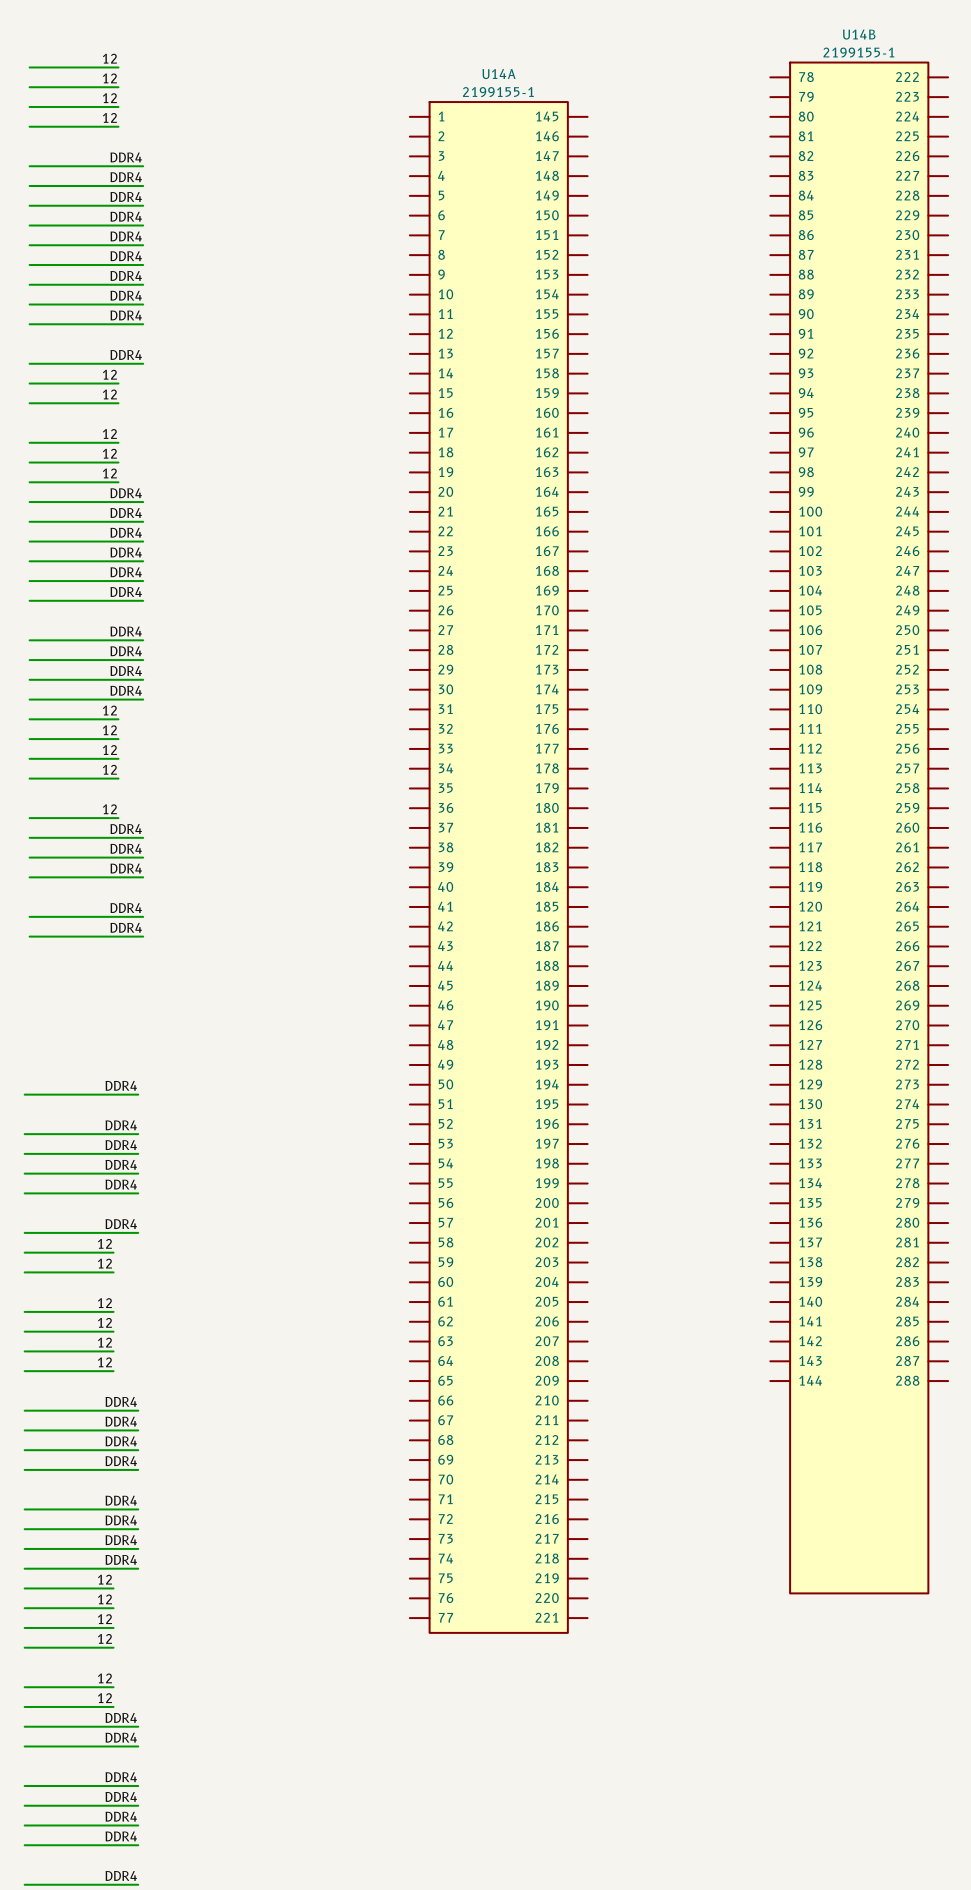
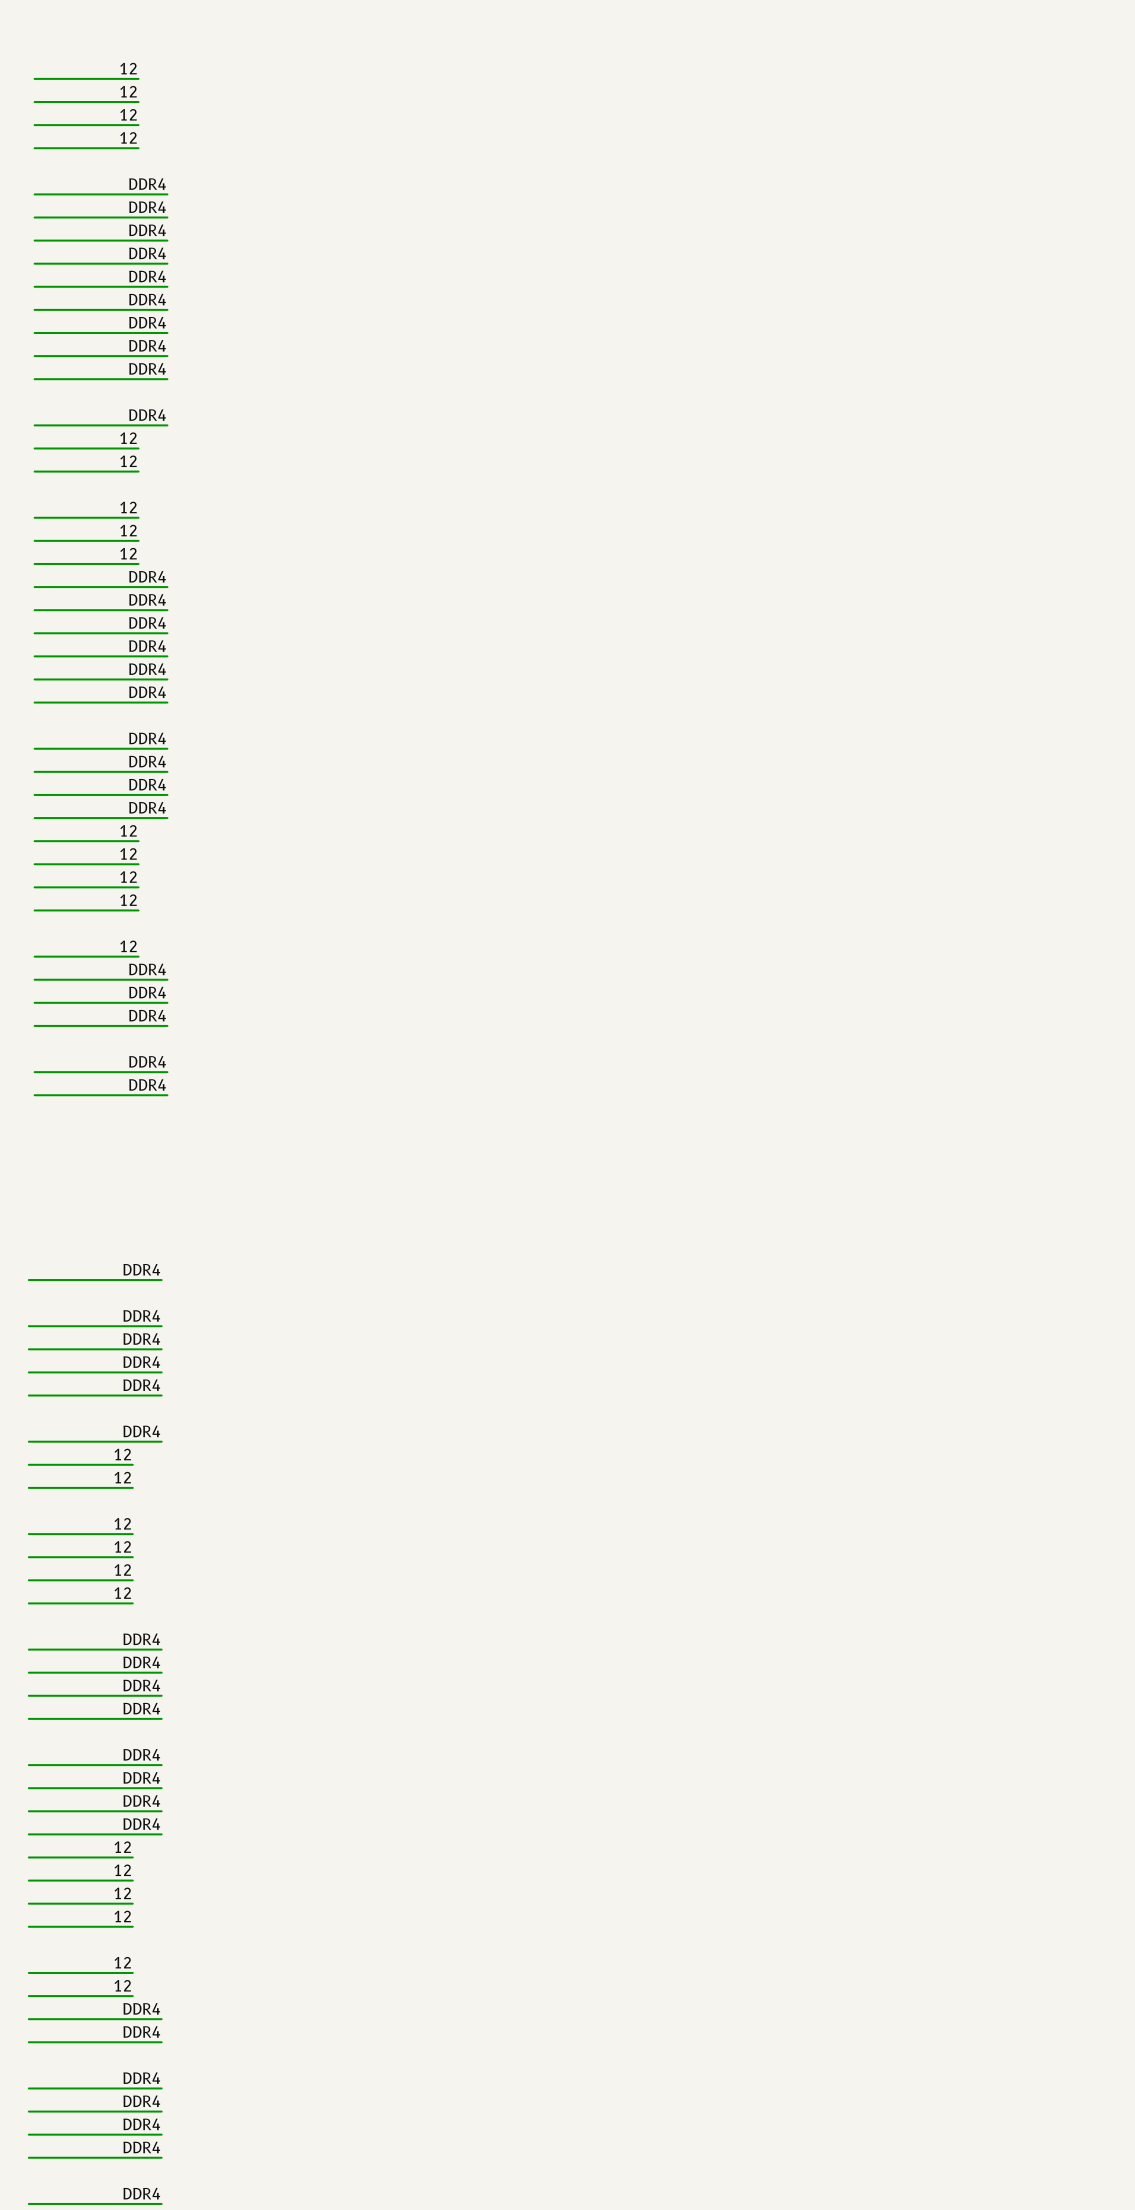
U14B: 2199155-1 (859, 827) -> none
U14A: 2199155-1 (498, 867) -> none

